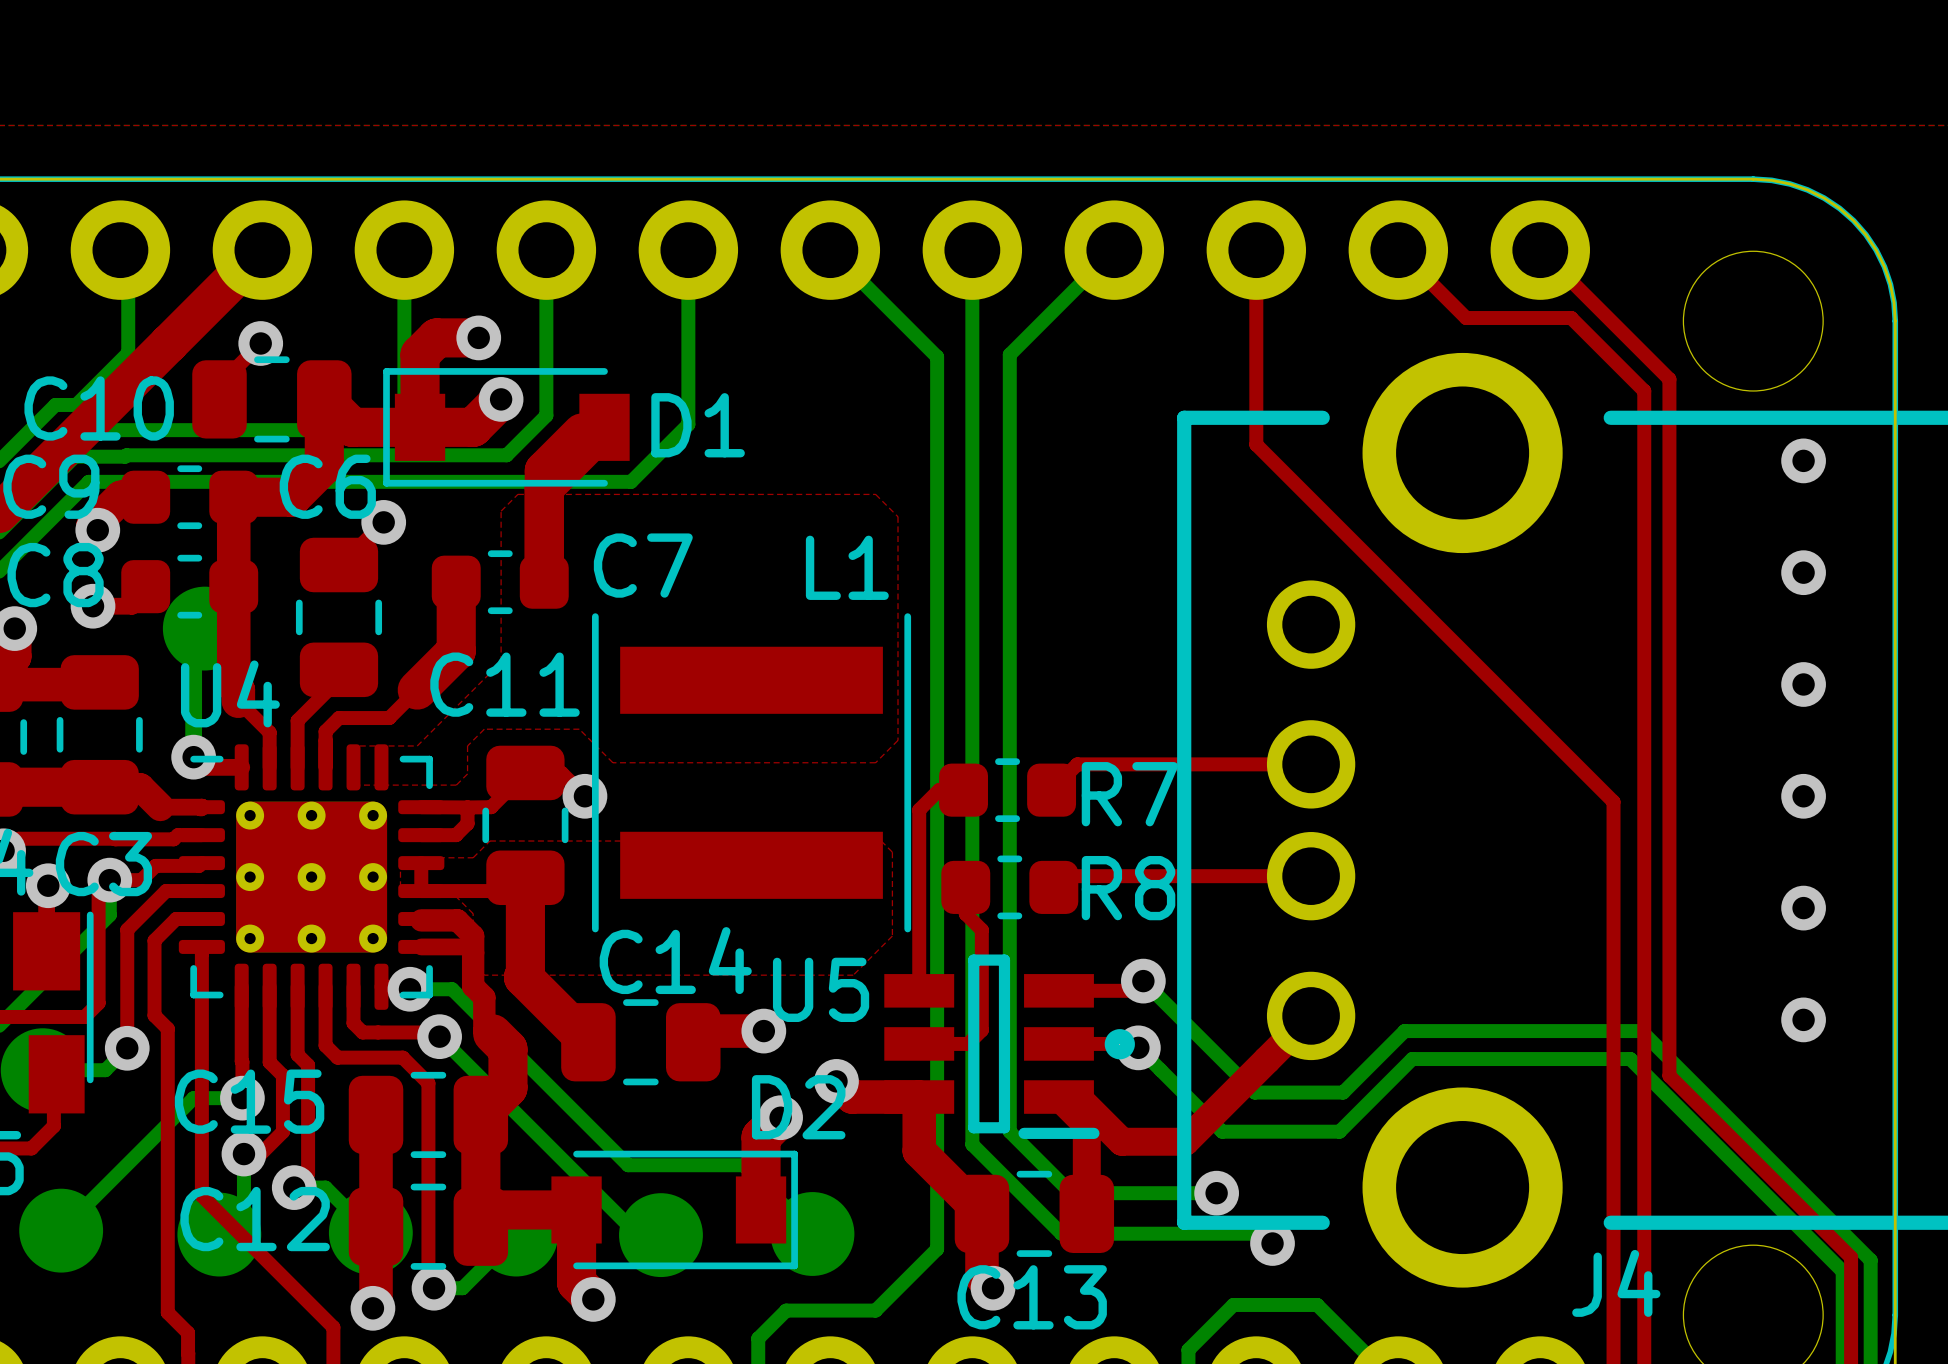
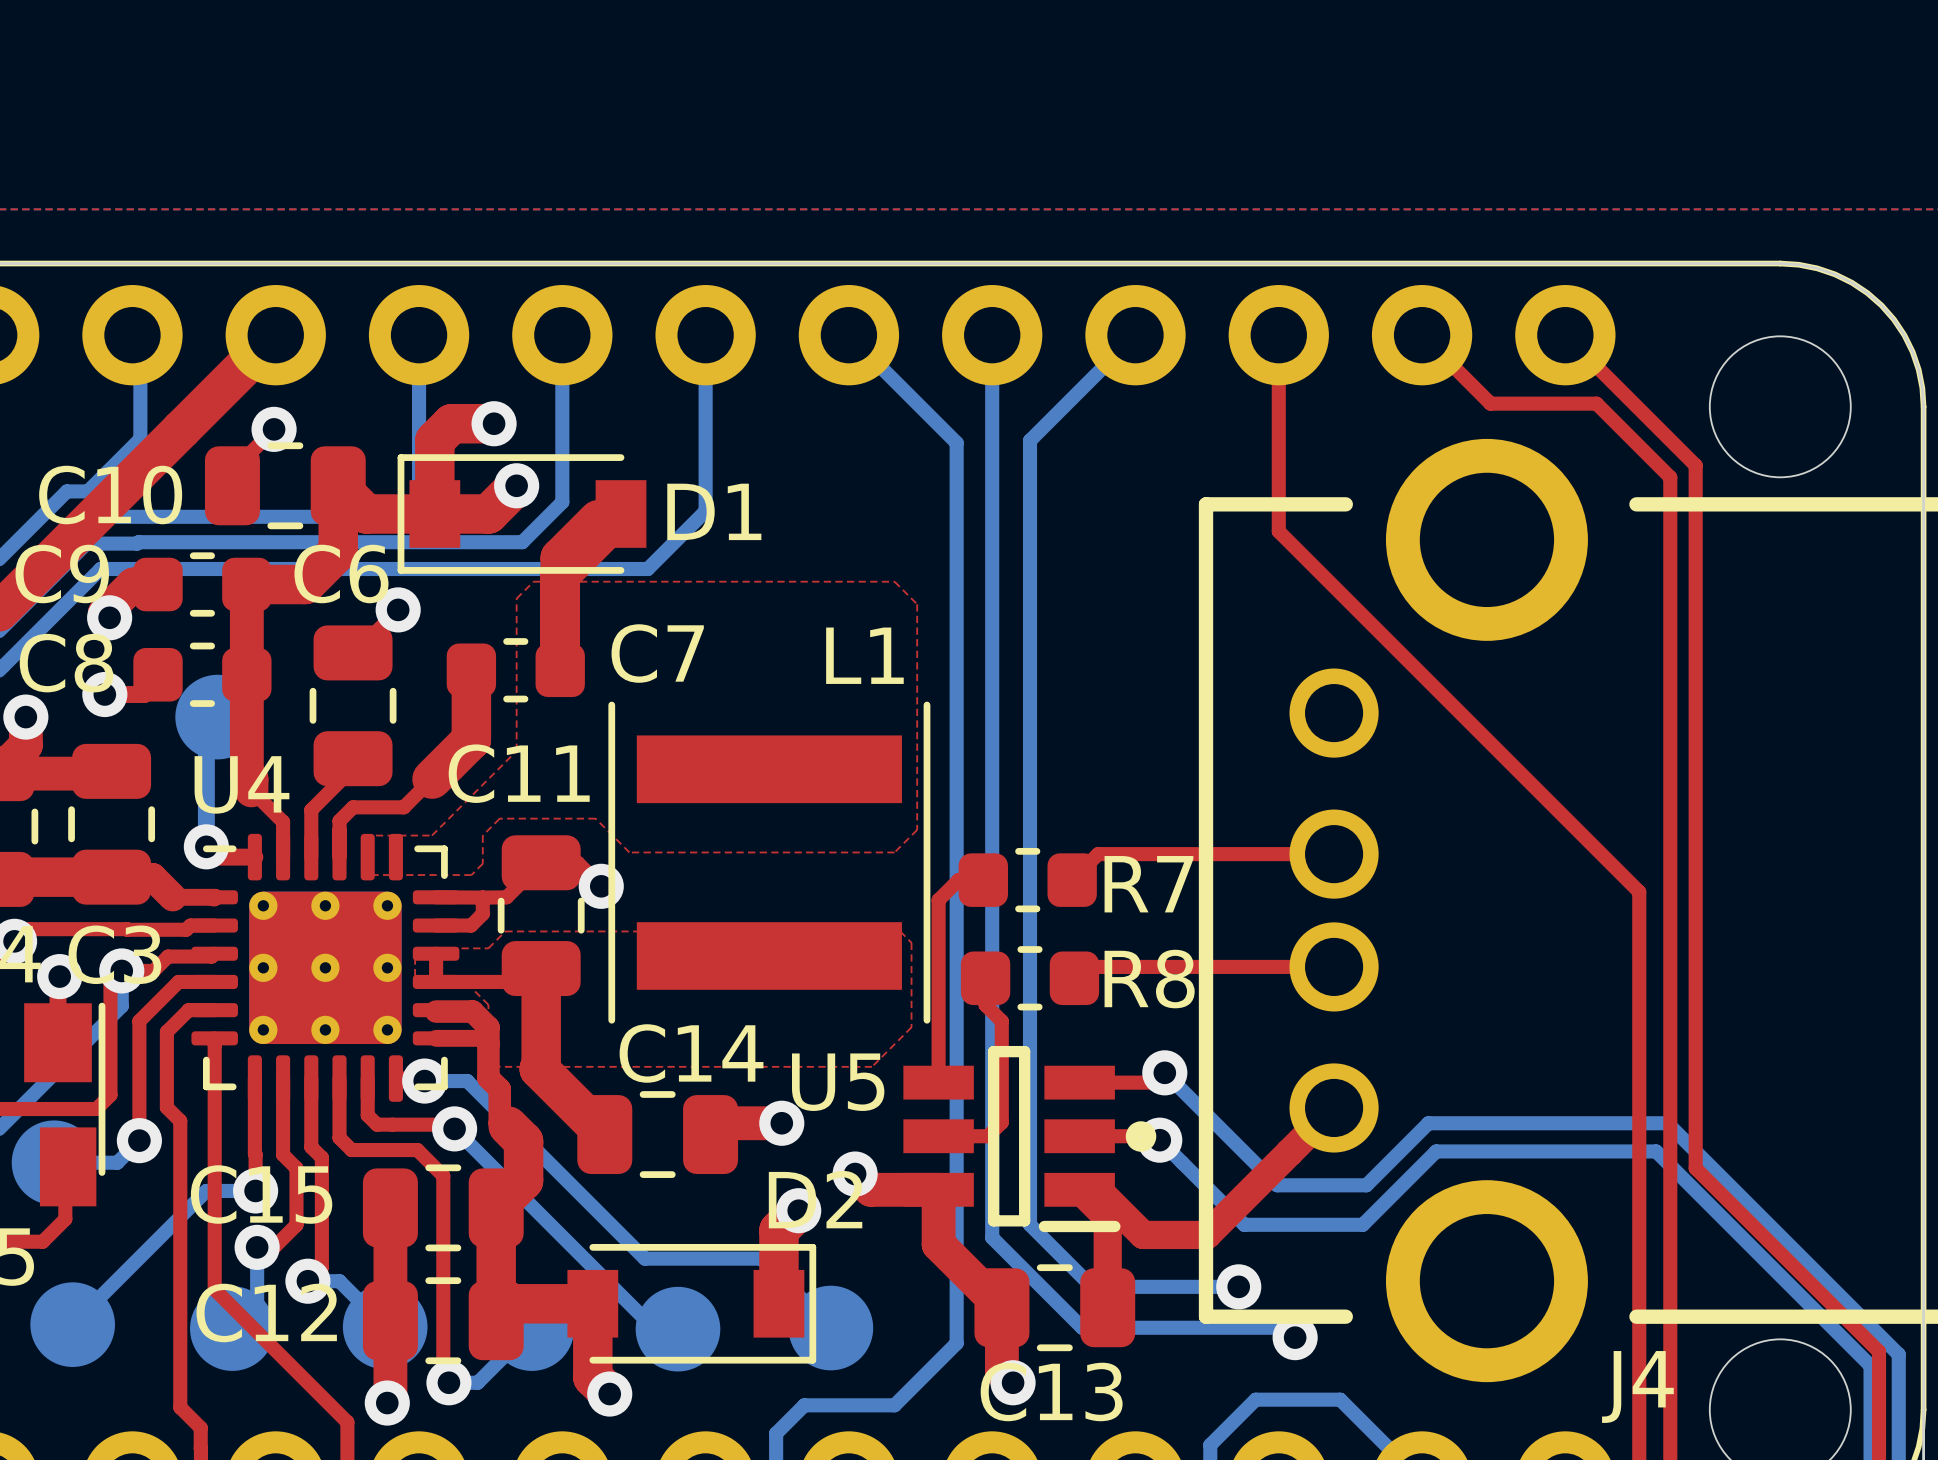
via: (1803, 460) -> none
via: (1803, 572) -> none
via: (1803, 684) -> none
via: (1803, 796) -> none
via: (1803, 908) -> none
via: (1803, 1019) -> none

